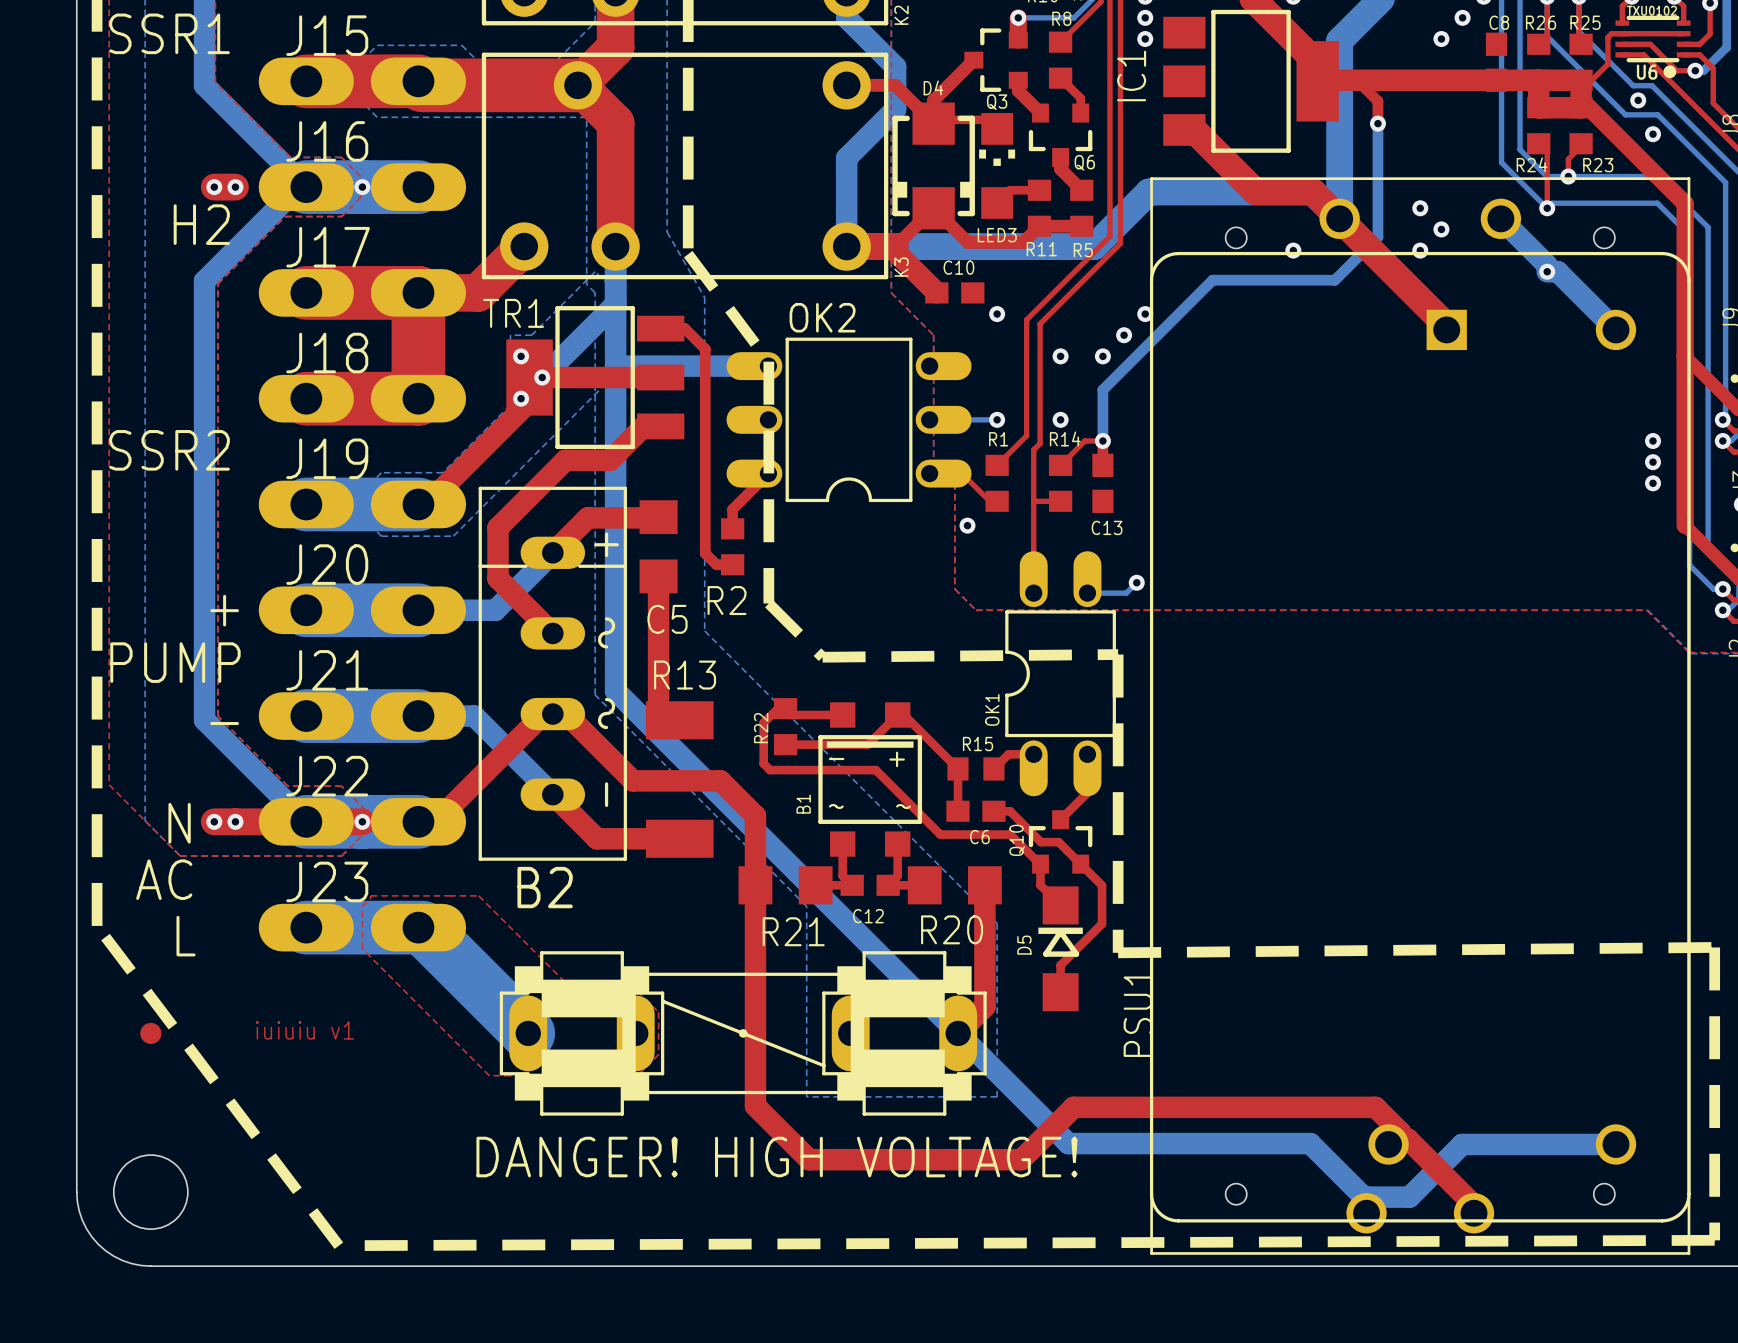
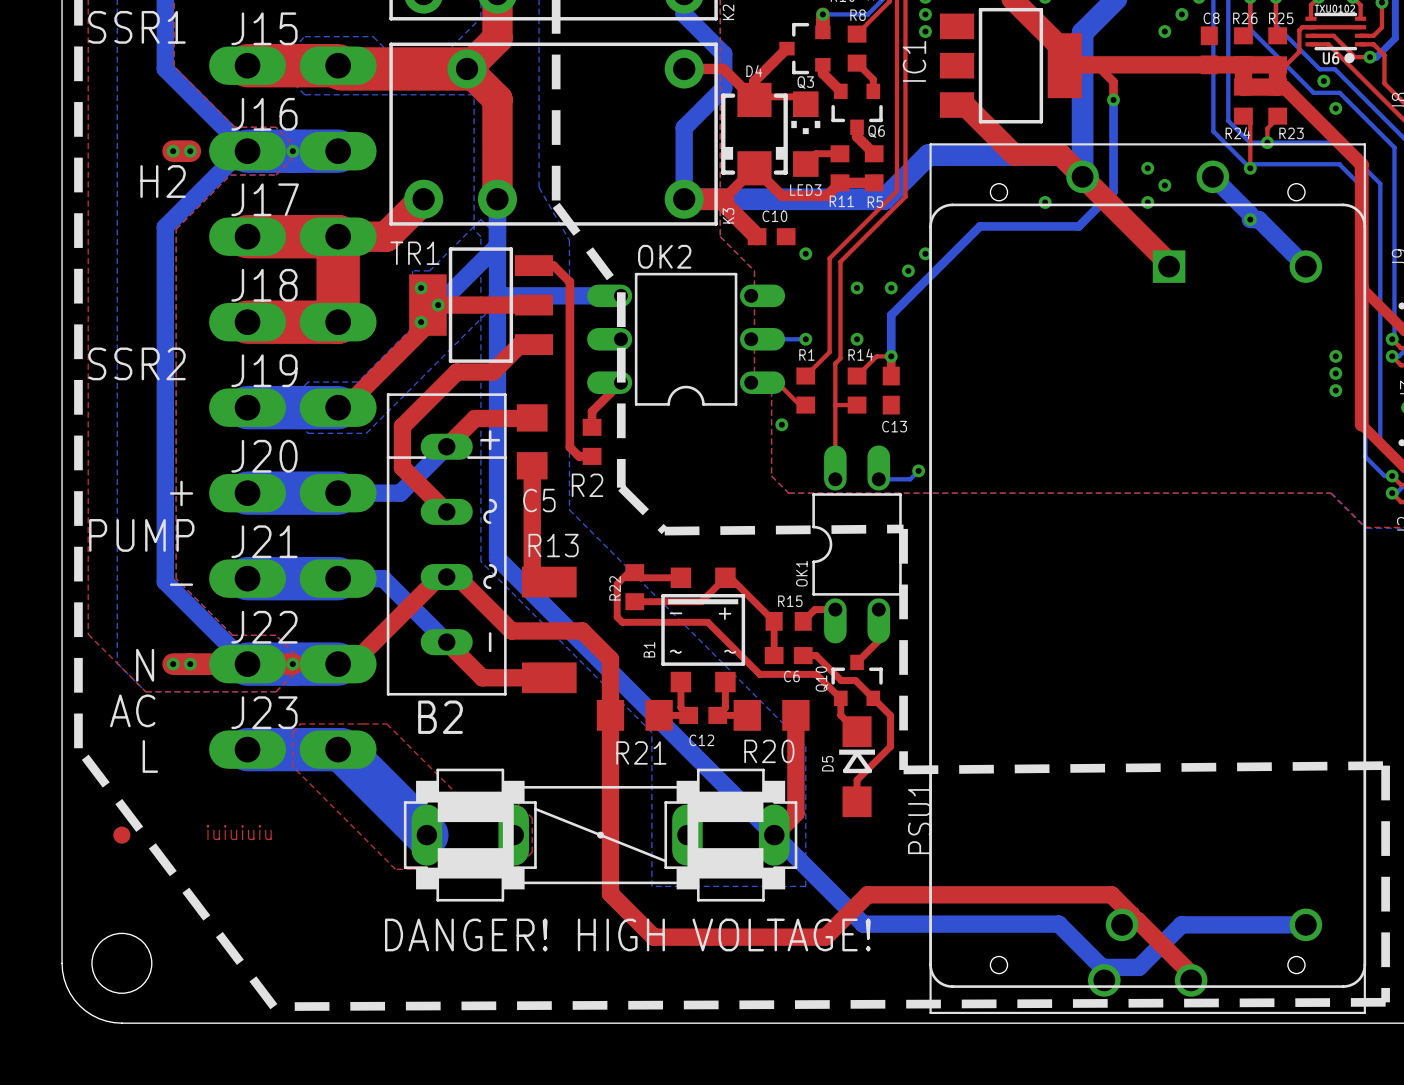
text: iuiuiu v1 (304, 1030) -> iuiuiuiu (239, 832)

